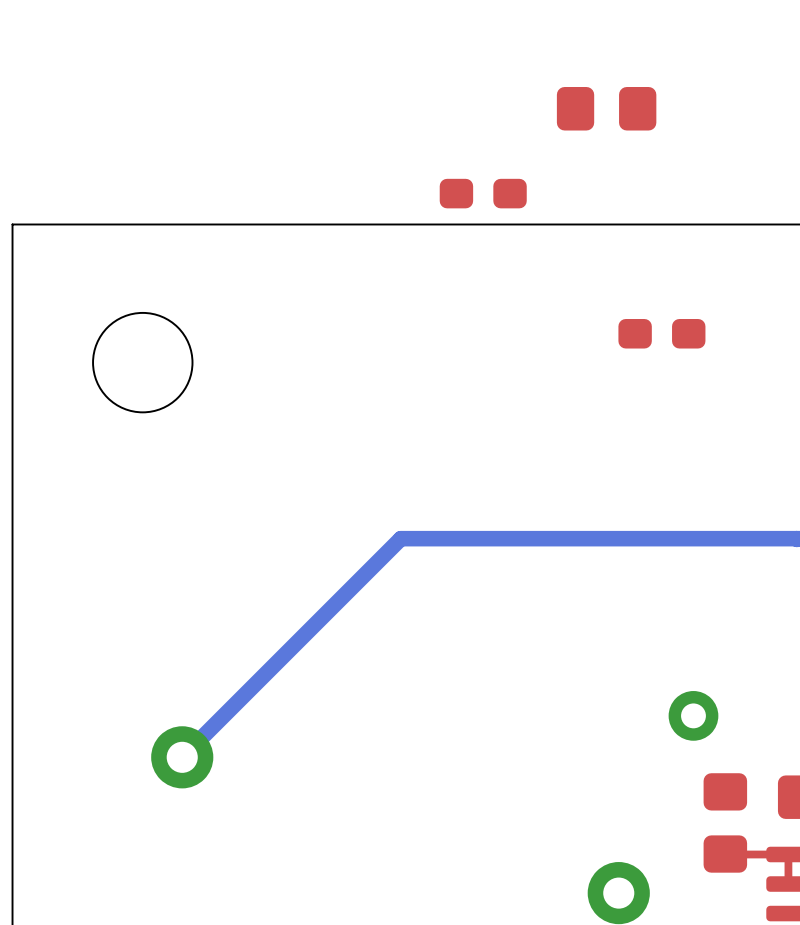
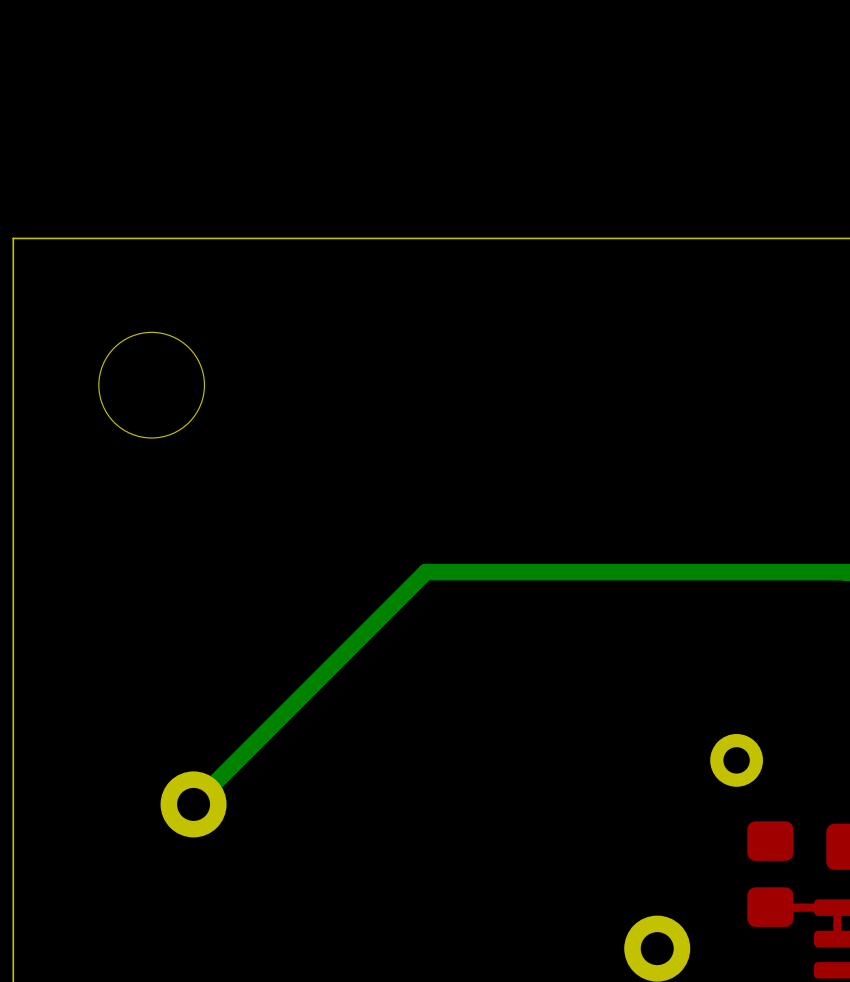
part: (606, 108) -> none
part: (483, 193) -> none
part: (661, 333) -> none

